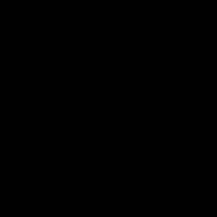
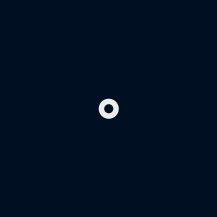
via: none -> (108, 108)

